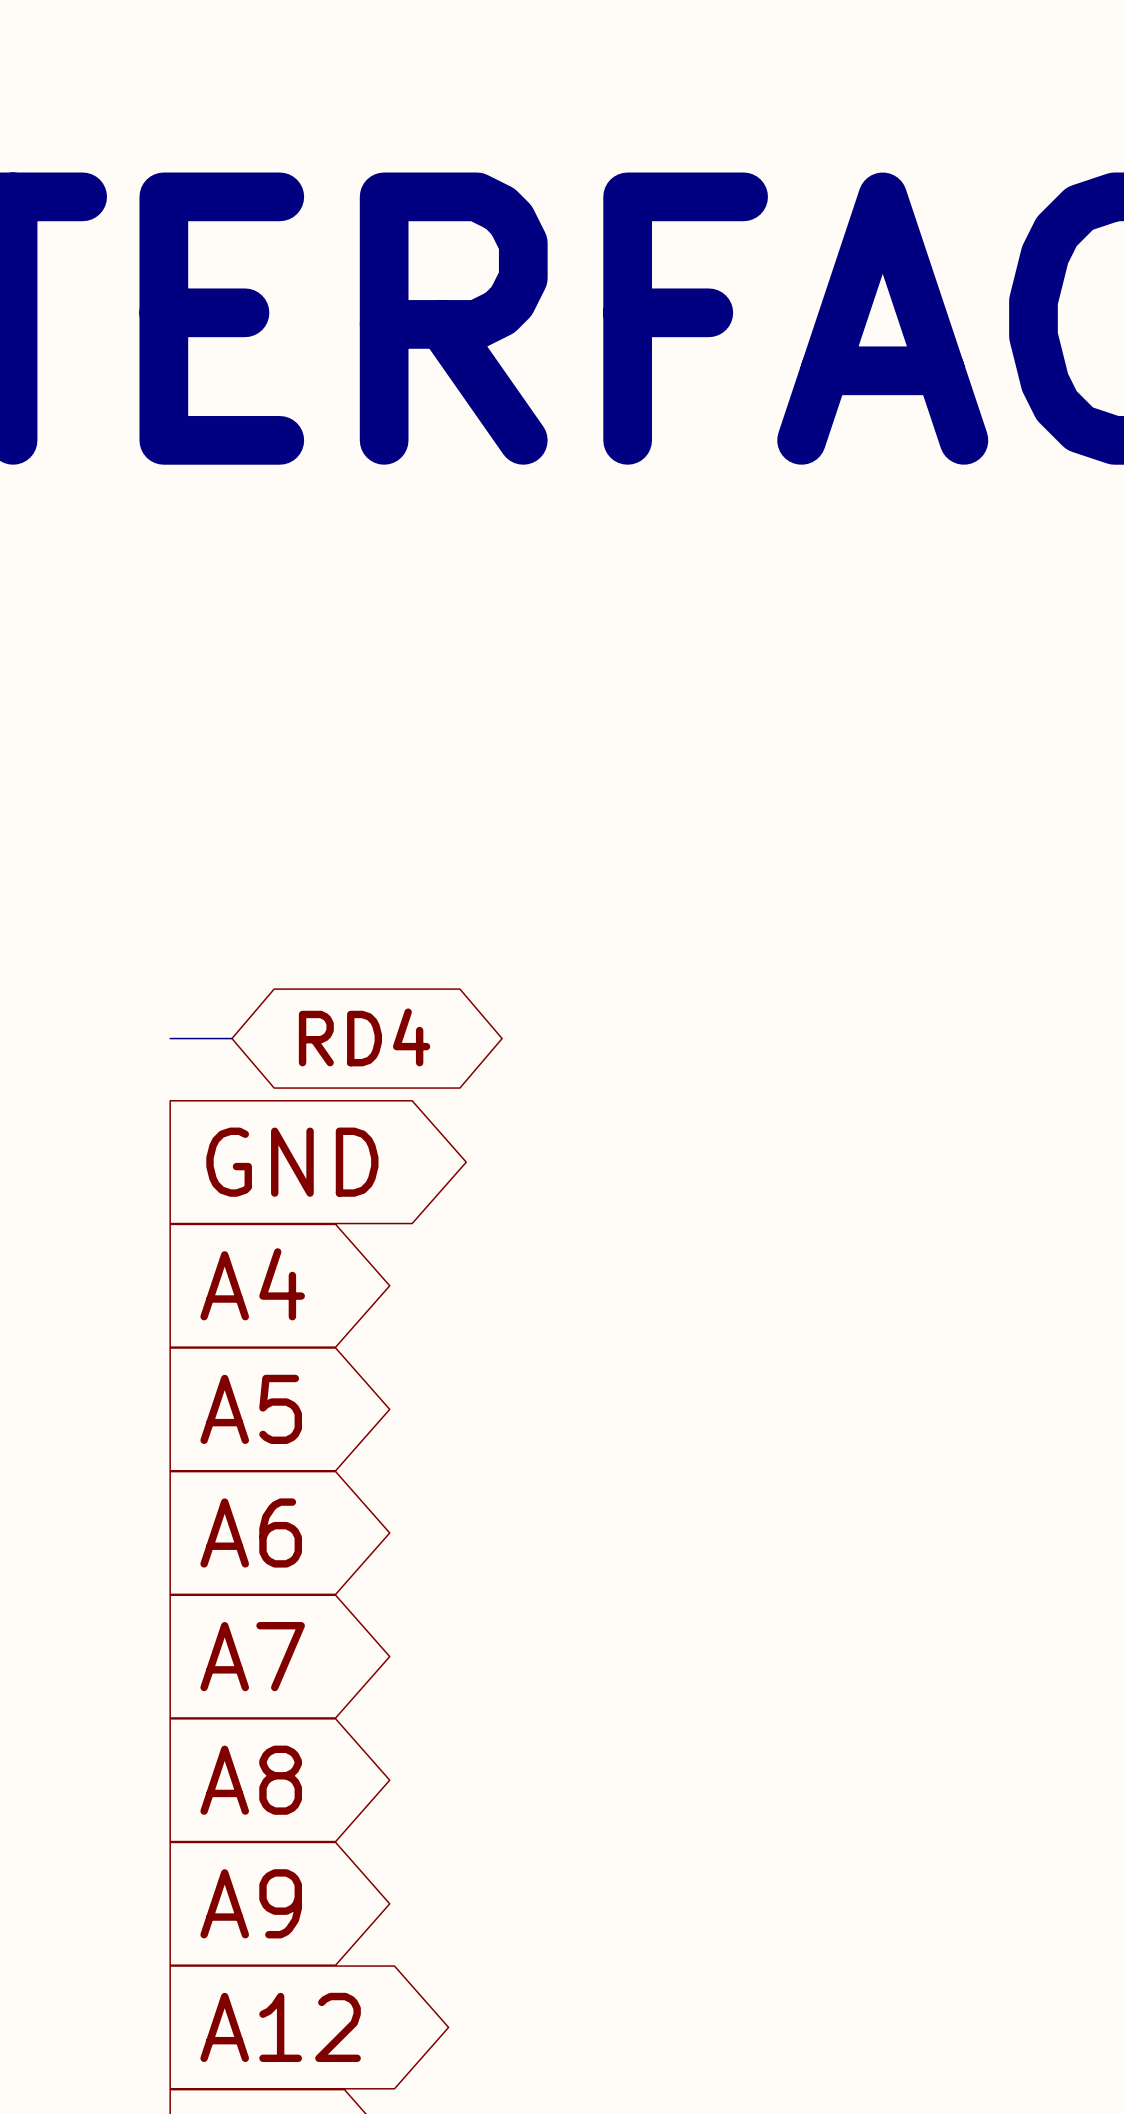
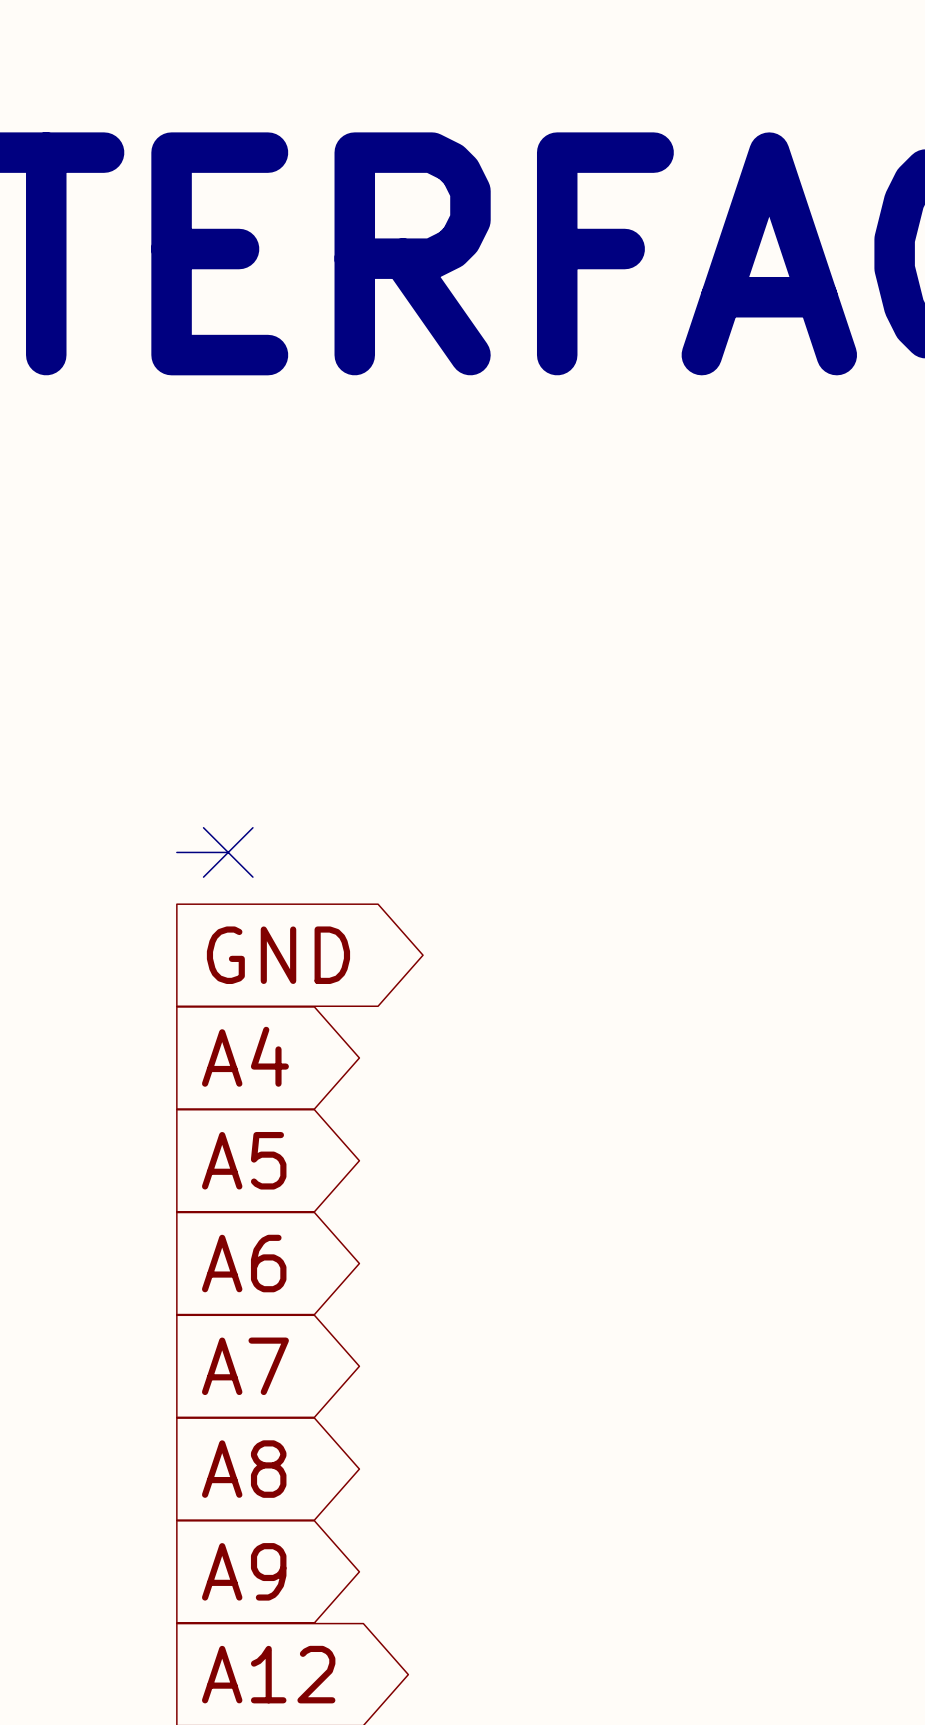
global label: RD4 (364, 1037) -> none
no-connect mark: none -> (228, 852)

